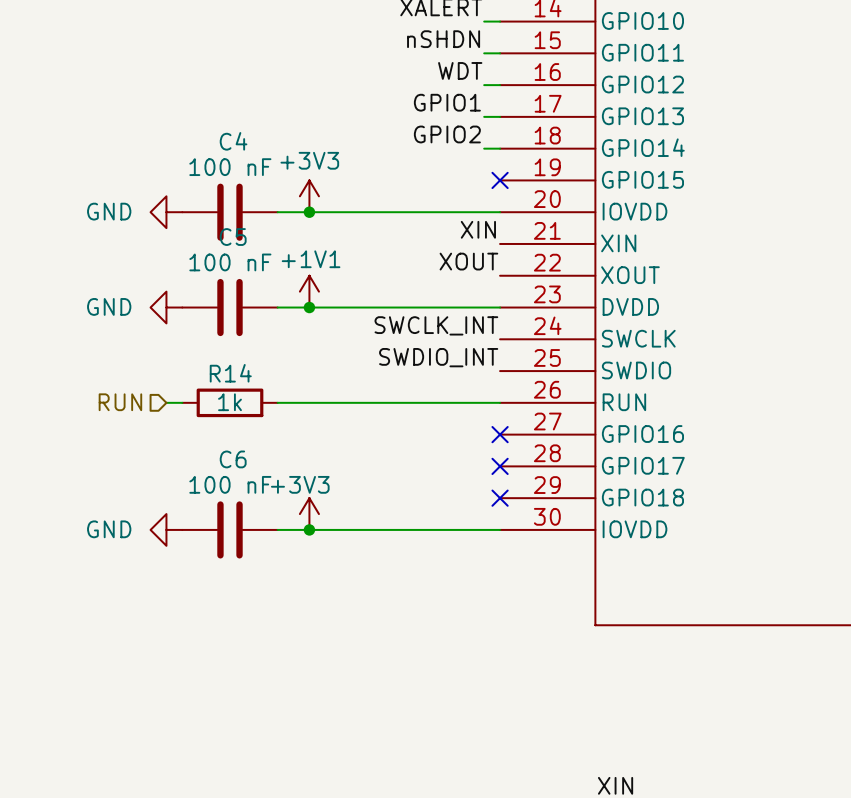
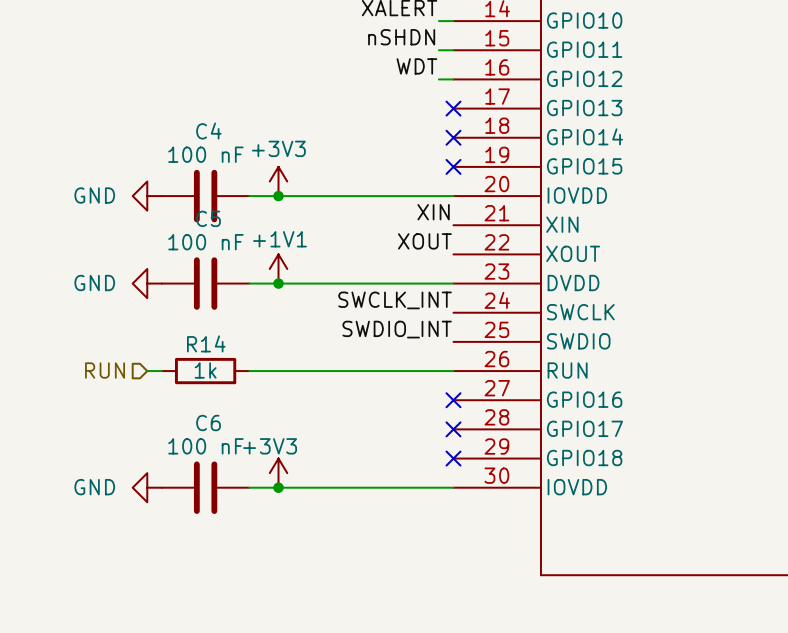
label: GPIO1 (447, 102) -> none
wire: (484, 116) (500, 116) -> none
no-connect mark: none -> (453, 108)
label: GPIO2 (447, 134) -> none
wire: (484, 148) (500, 148) -> none
no-connect mark: none -> (453, 137)

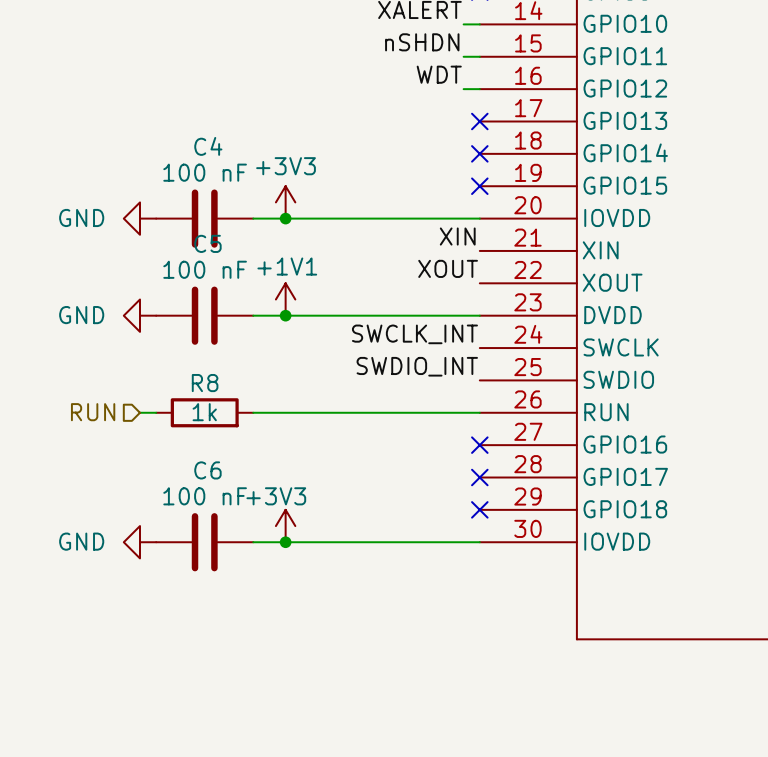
R14 name: R14 (206, 343) -> R8 (205, 383)

